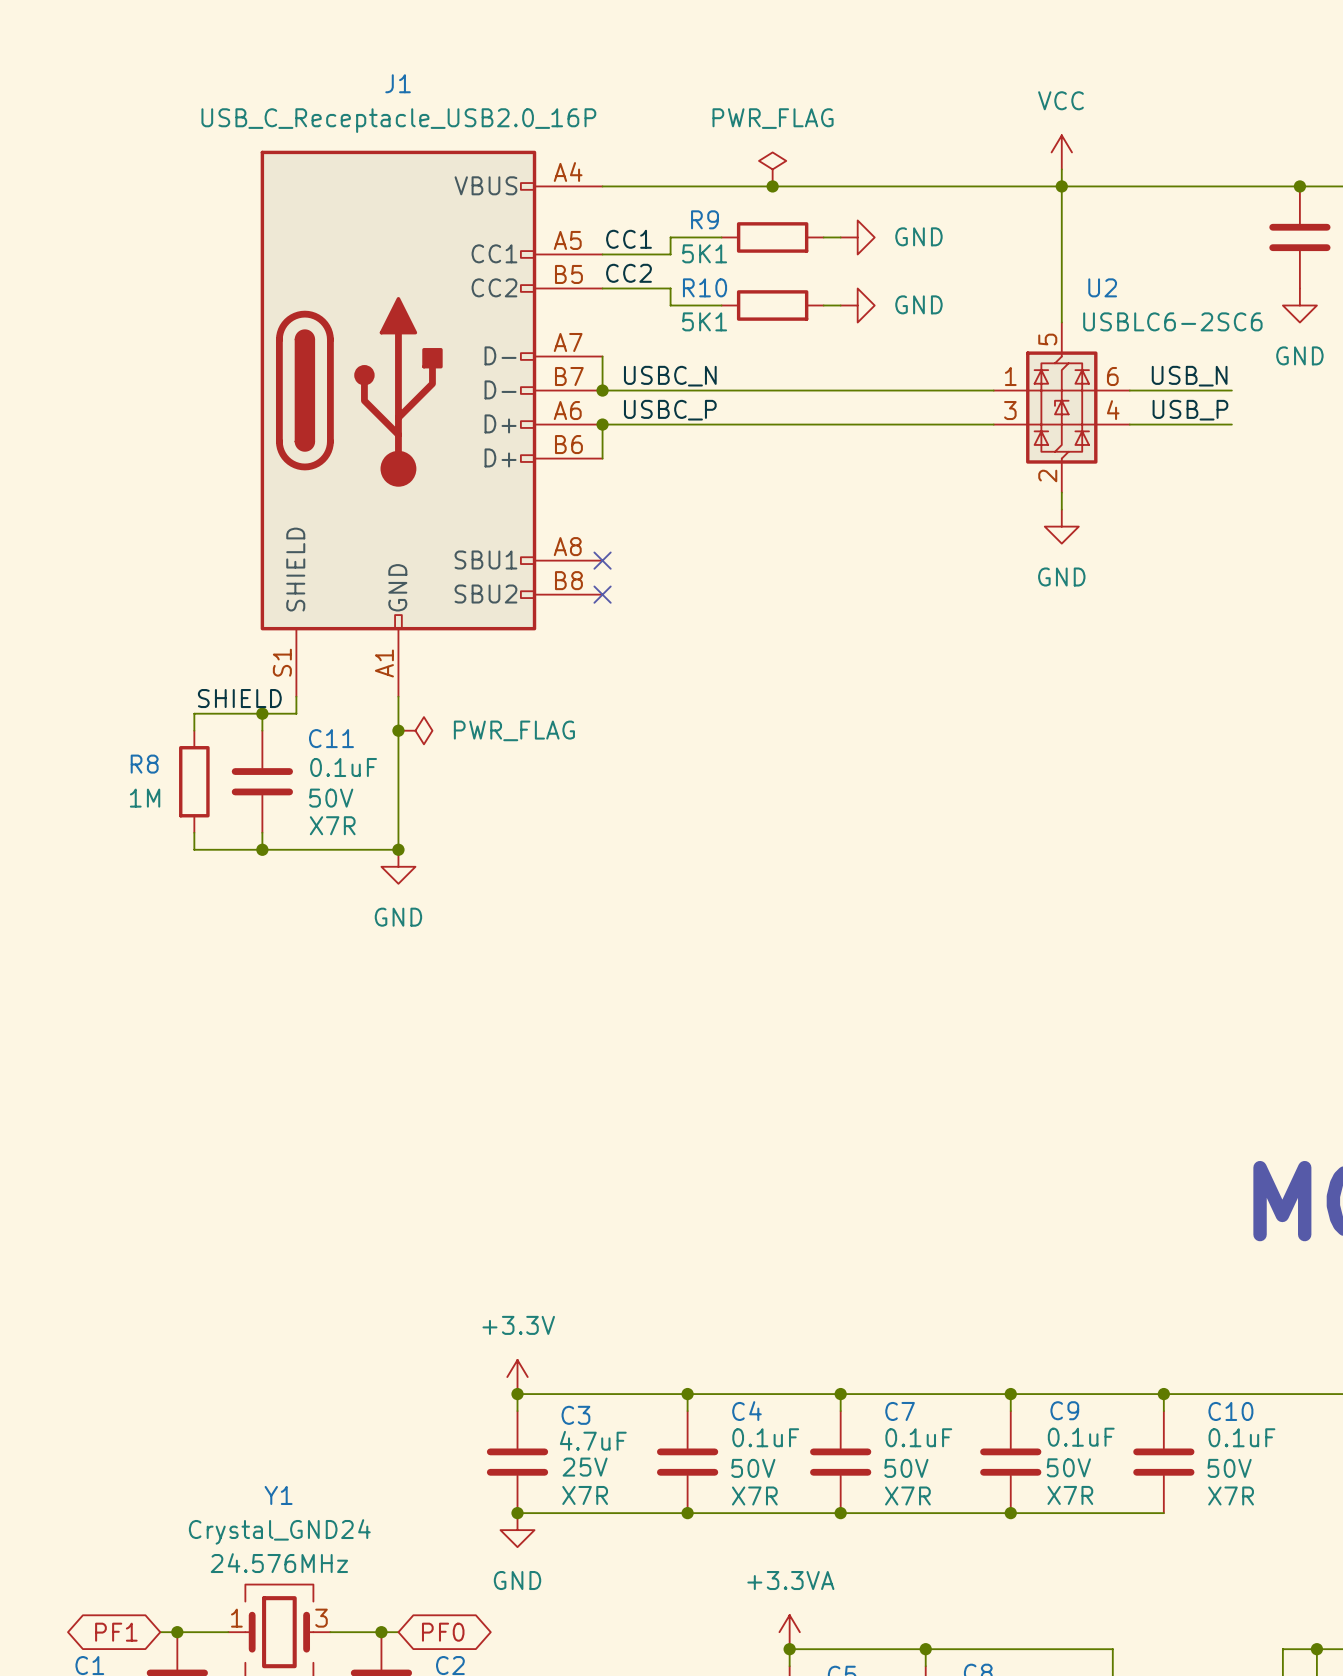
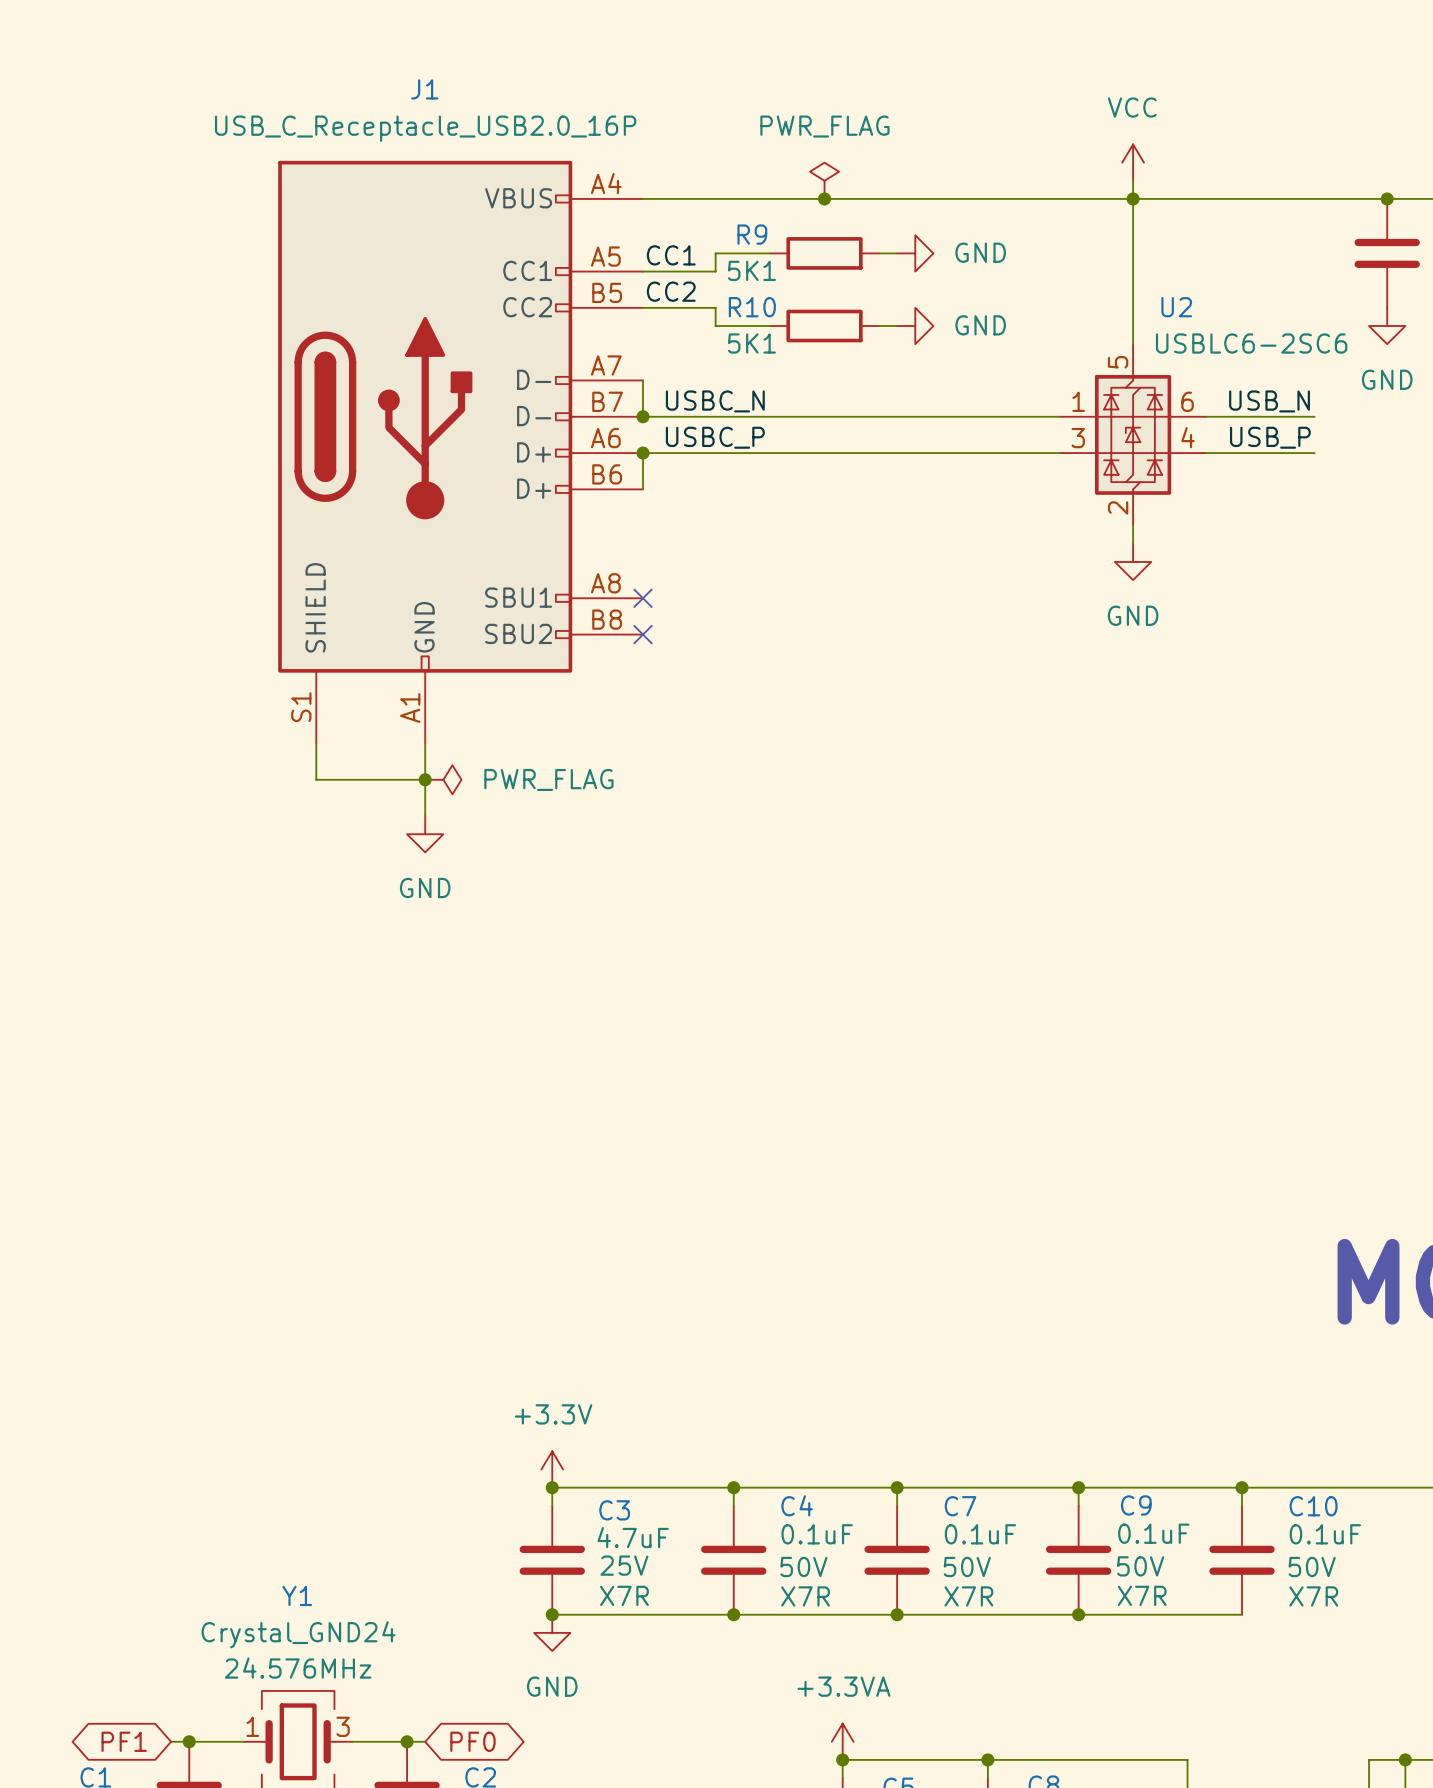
label: SHIELD (239, 698) -> none
wire: (262, 713) (262, 730) -> none
junction: (262, 713) -> none
wire: (296, 713) (194, 713) (194, 730) -> (316, 761) (316, 779) (425, 779)
wire: (398, 764) (398, 849) (194, 849) (194, 832) -> none
R8: 1M (194, 781) -> none
C11: 0.1uF (262, 781) -> none
wire: (262, 832) (262, 849) -> none
junction: (262, 849) -> none
junction: (398, 849) -> none
power symbol position: GND (398, 866) -> GND (425, 834)

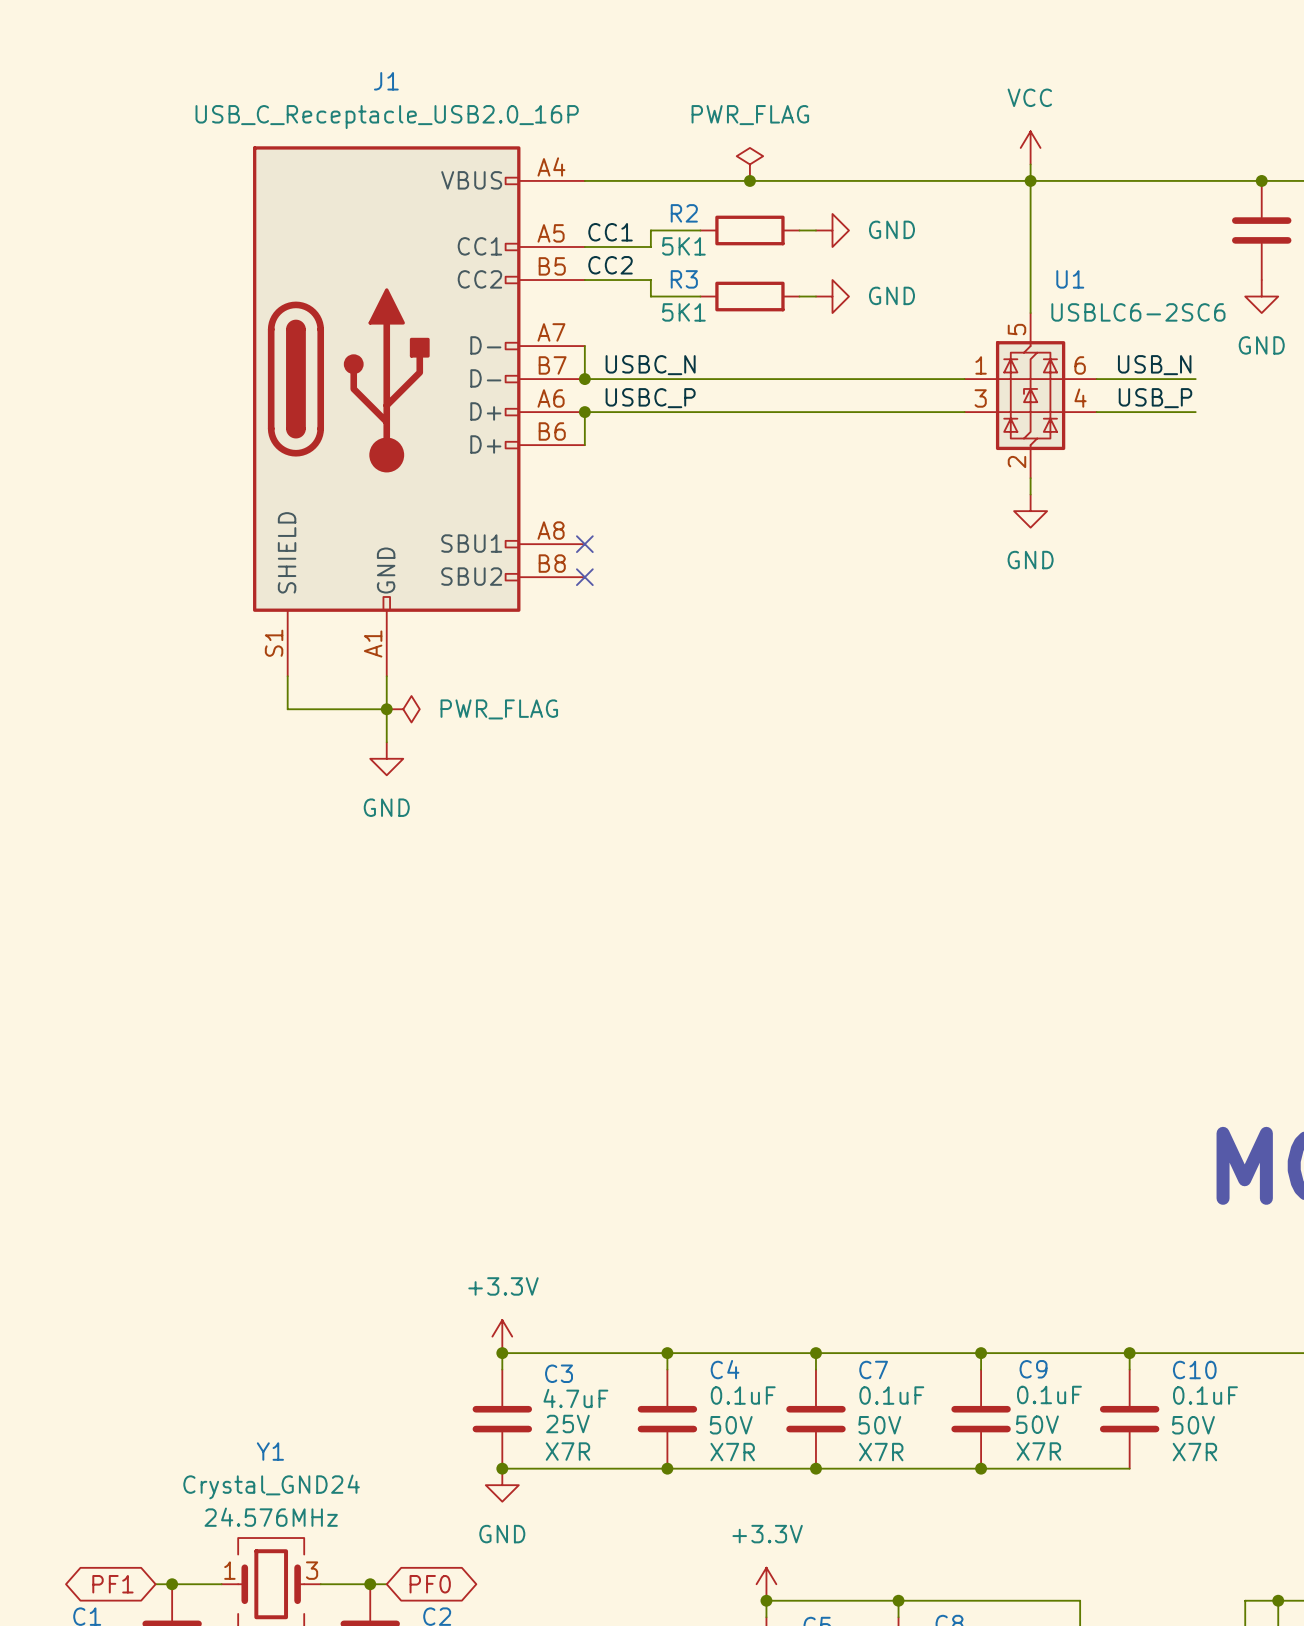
R9 name: R9 (752, 234) -> R2 (684, 213)
R10 name: R10 (752, 307) -> R3 (684, 279)
U2 name: U2 (1176, 307) -> U1 (1070, 279)
power symbol: +3.3VA (842, 1741) -> +3.3V (766, 1584)

